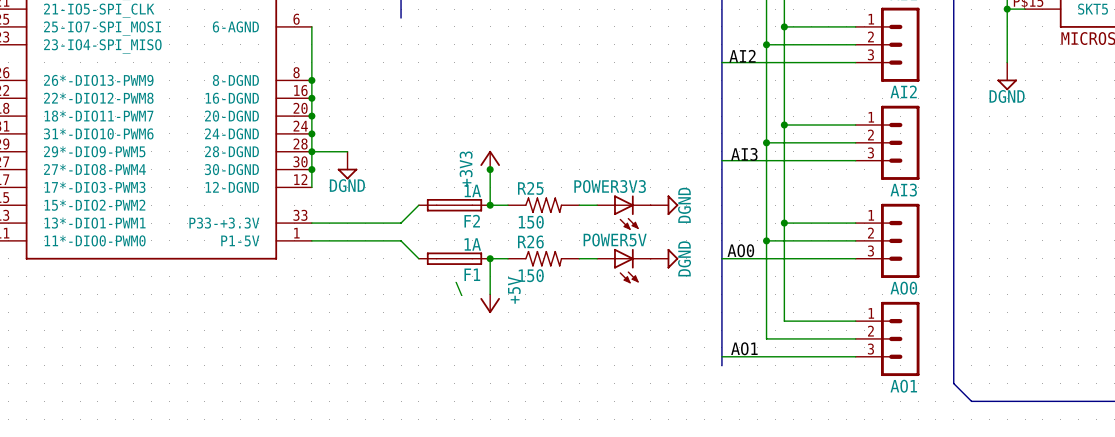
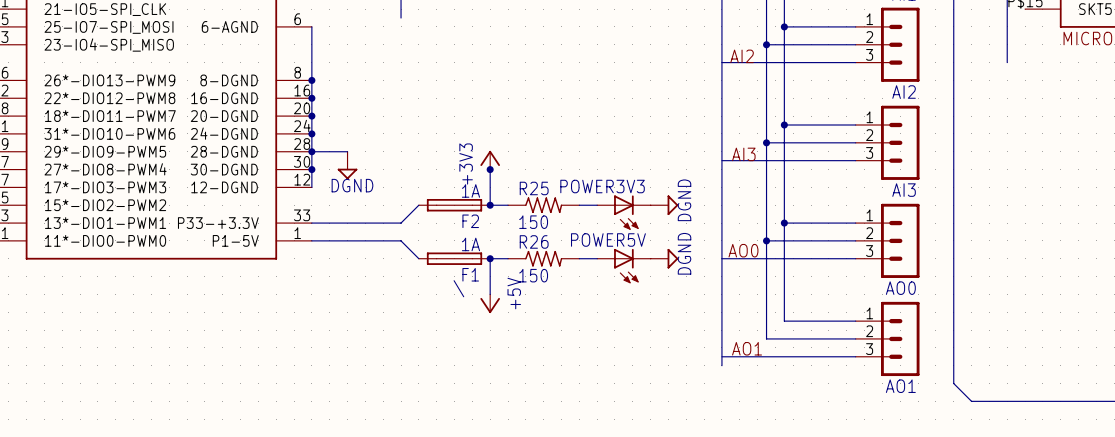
wire: (1007, 9) (1025, 9) -> none
junction: (1007, 9) -> none
power symbol: DGND (1007, 76) -> none

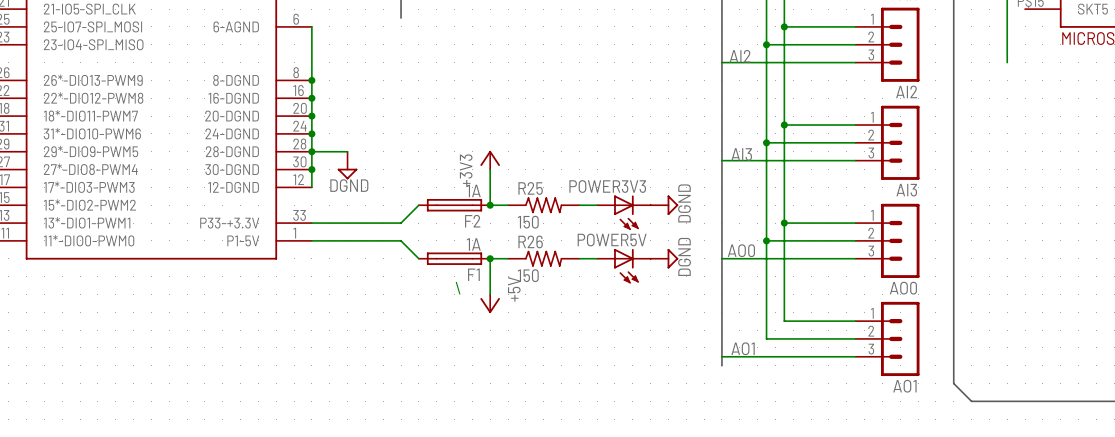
junction: (490, 169) -> none

